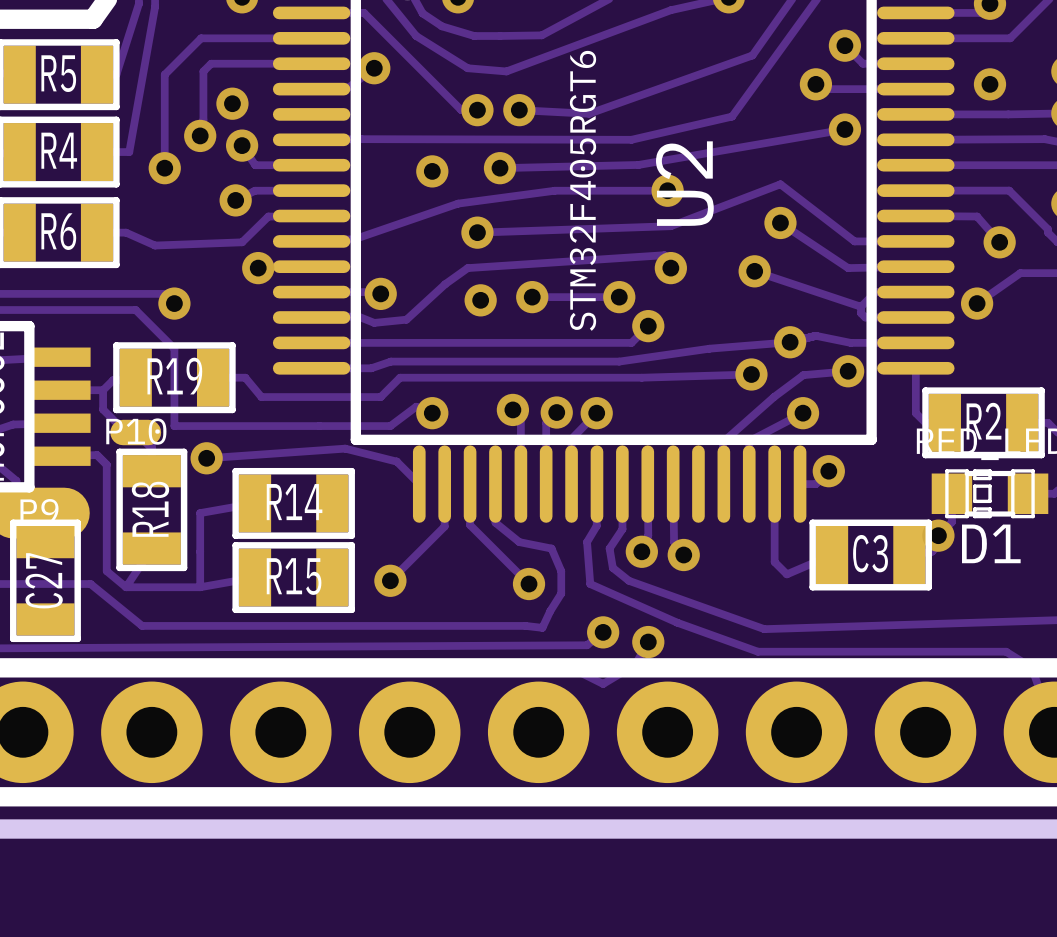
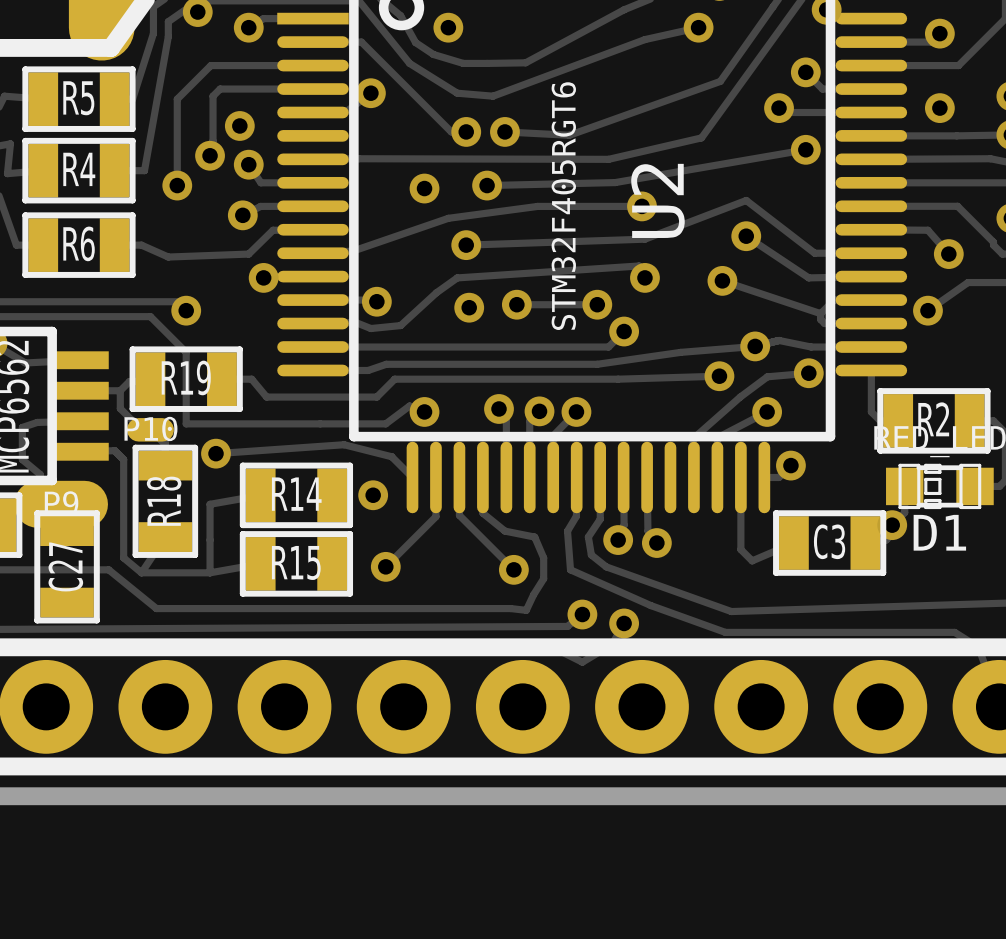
via: none -> (373, 495)

